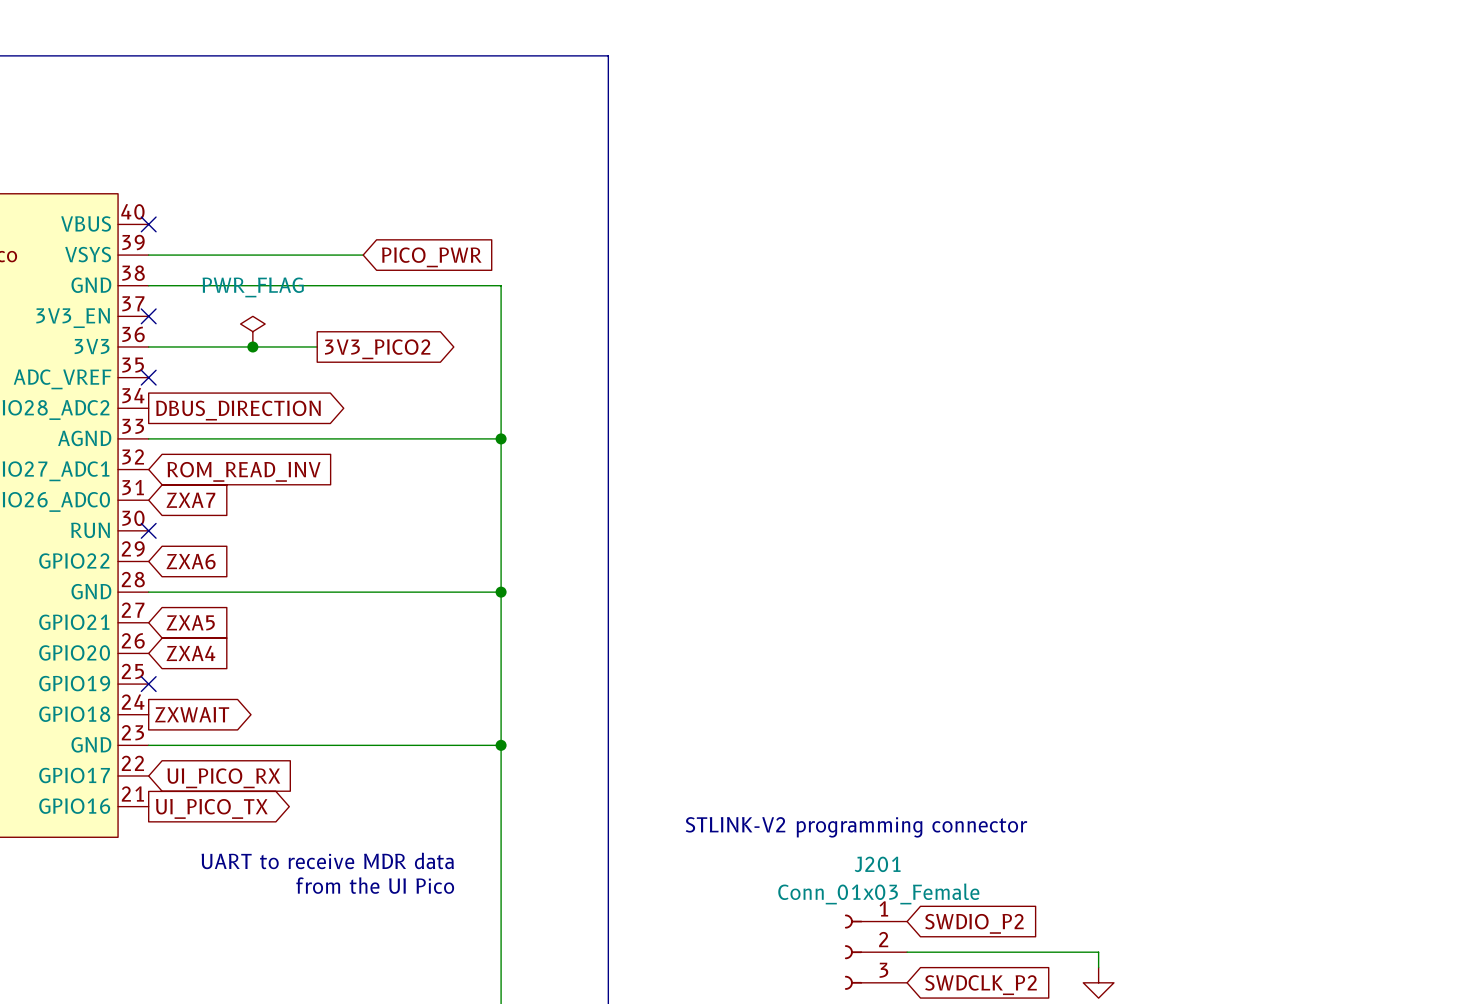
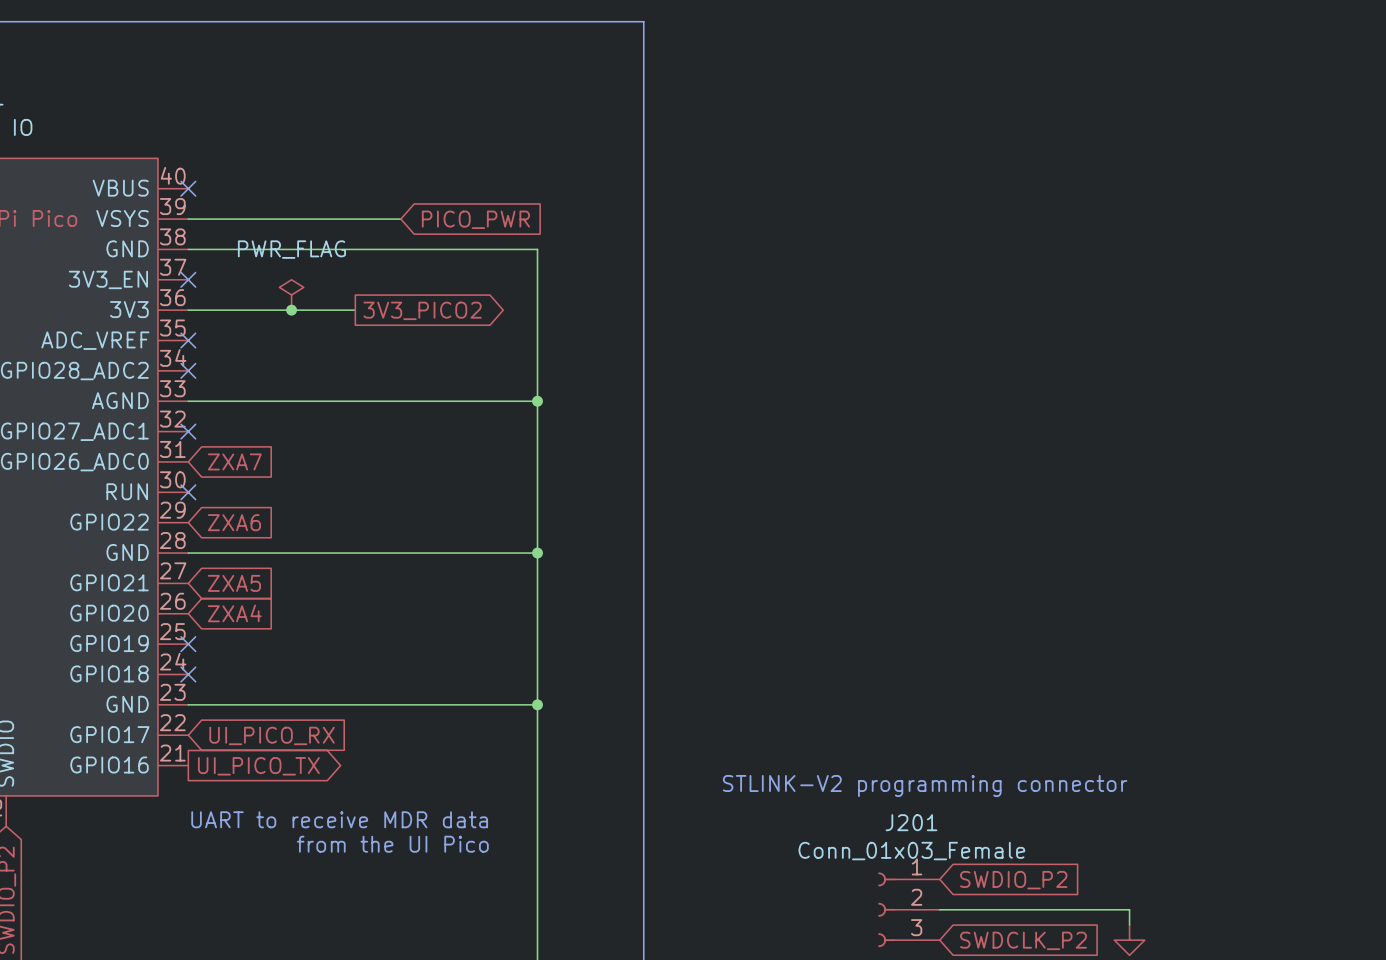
no-connect mark: none -> (188, 370)
global label: DBUS_DIRECTION (238, 410) -> none
no-connect mark: none -> (188, 431)
global label: ROM_READ_INV (244, 471) -> none
no-connect mark: none -> (188, 674)
global label: ZXWAIT (192, 714) -> none

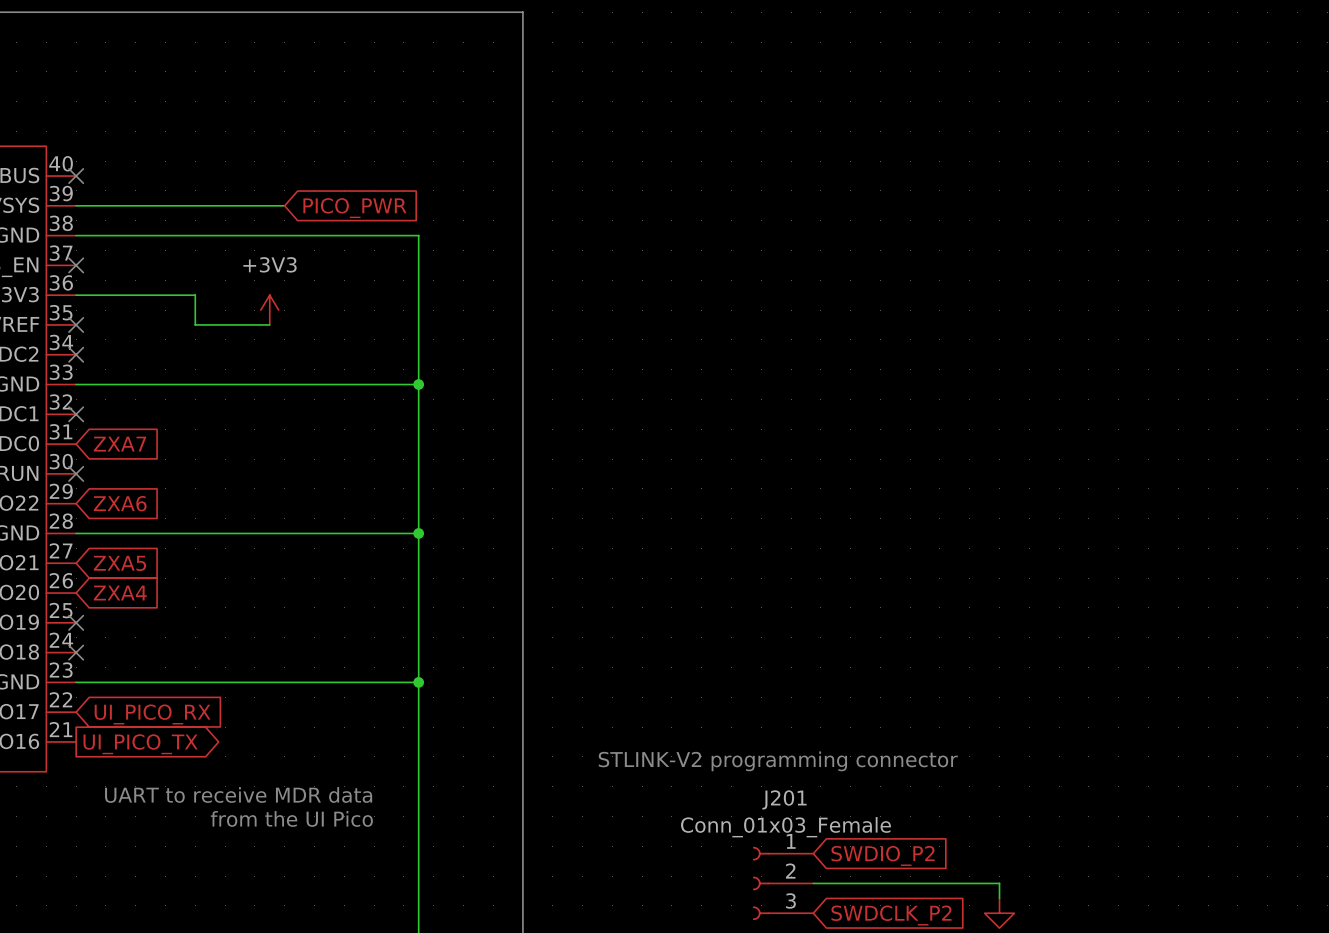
power symbol: PWR_FLAG (291, 294) -> none
junction: (291, 310) -> none
wire: (309, 310) (355, 310) -> (195, 295) (195, 324) (269, 324)
global label: 3V3_PICO2 (422, 310) -> none
power symbol: none -> +3V3 (269, 310)

